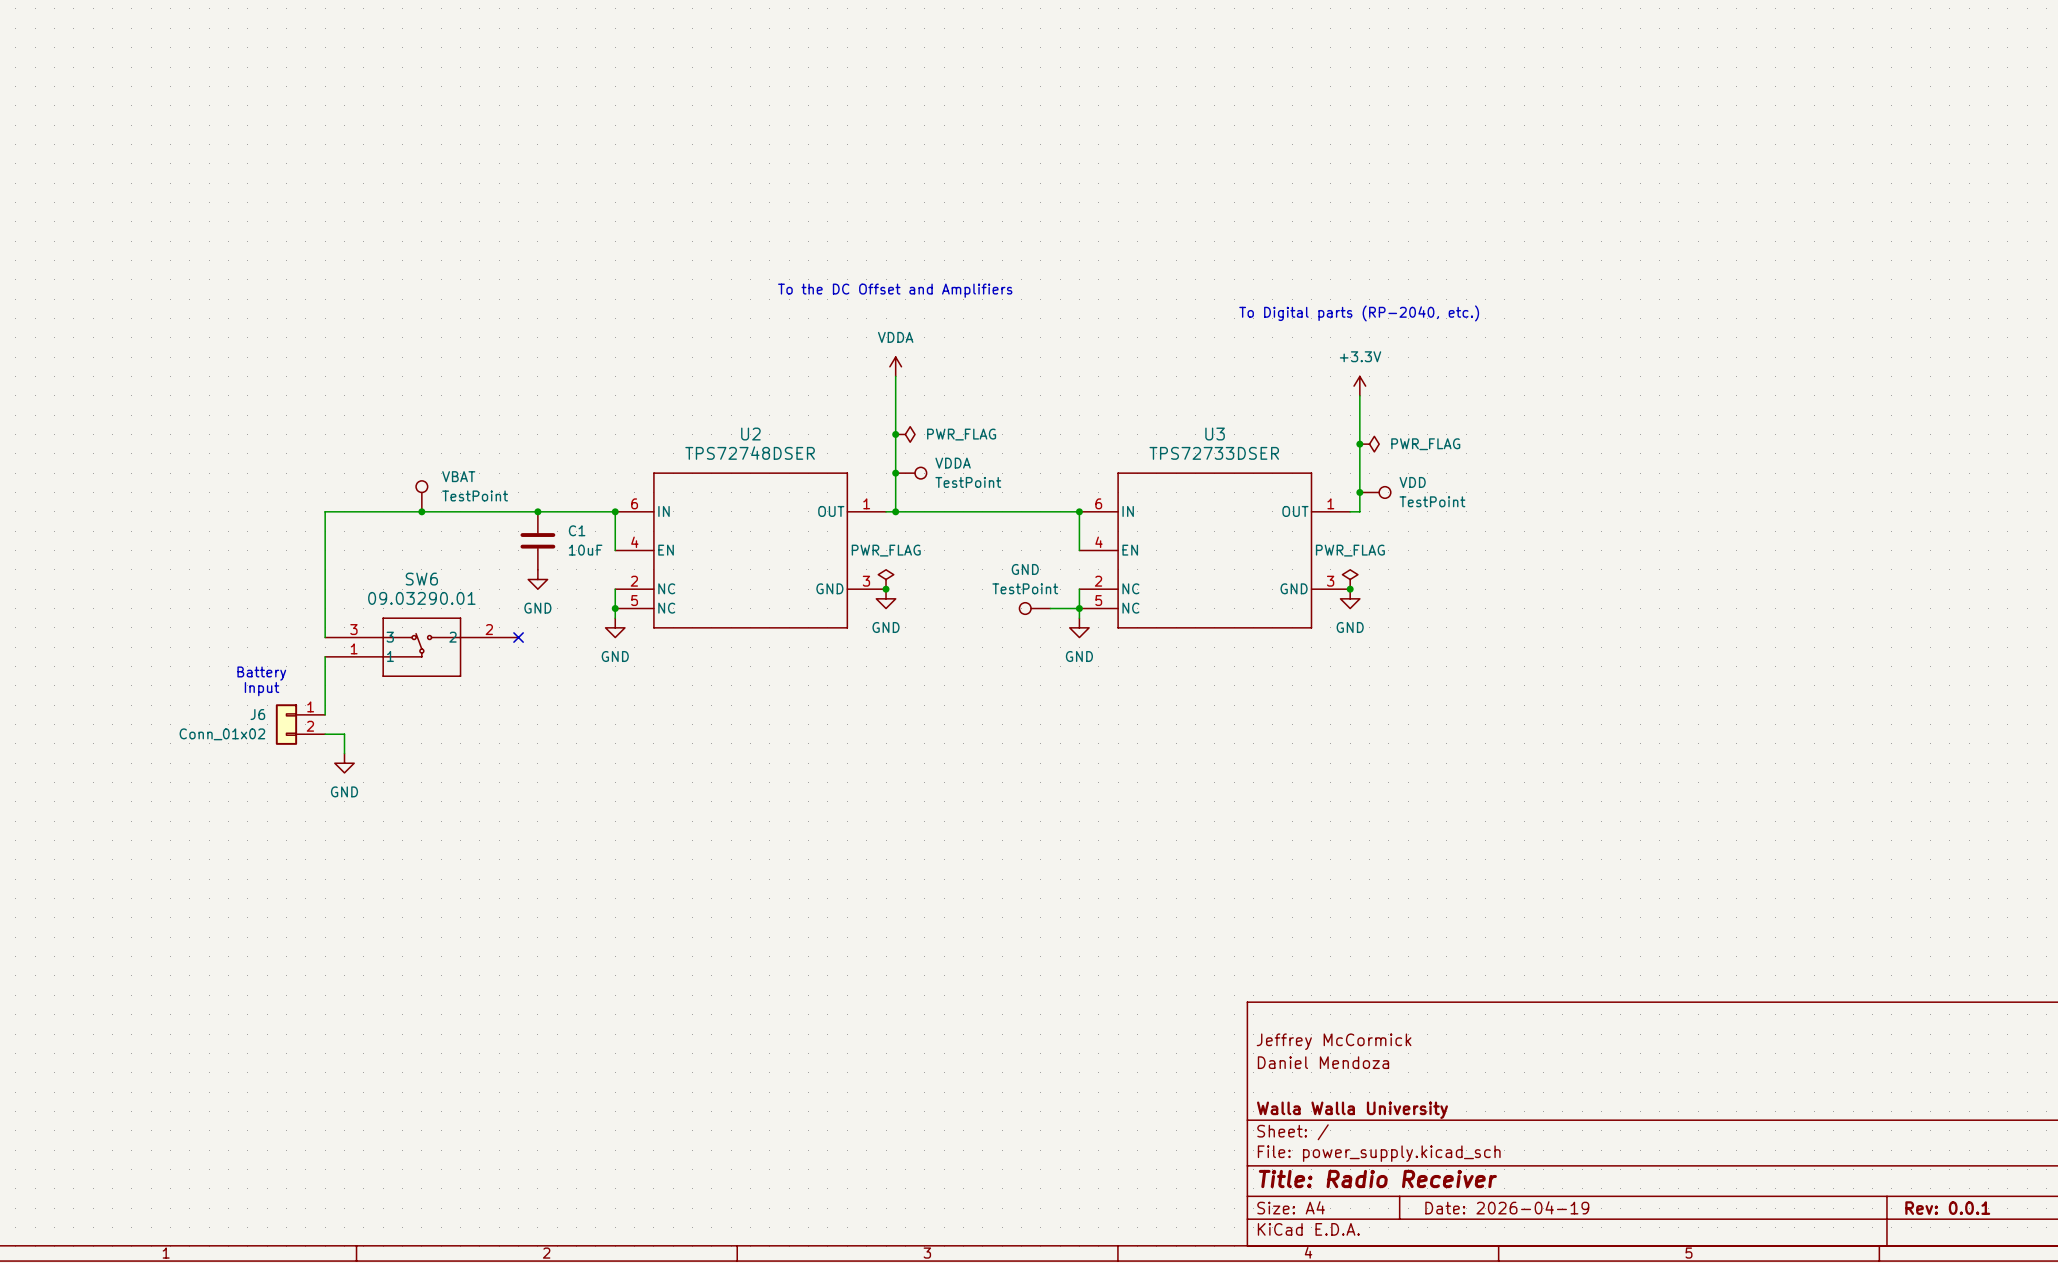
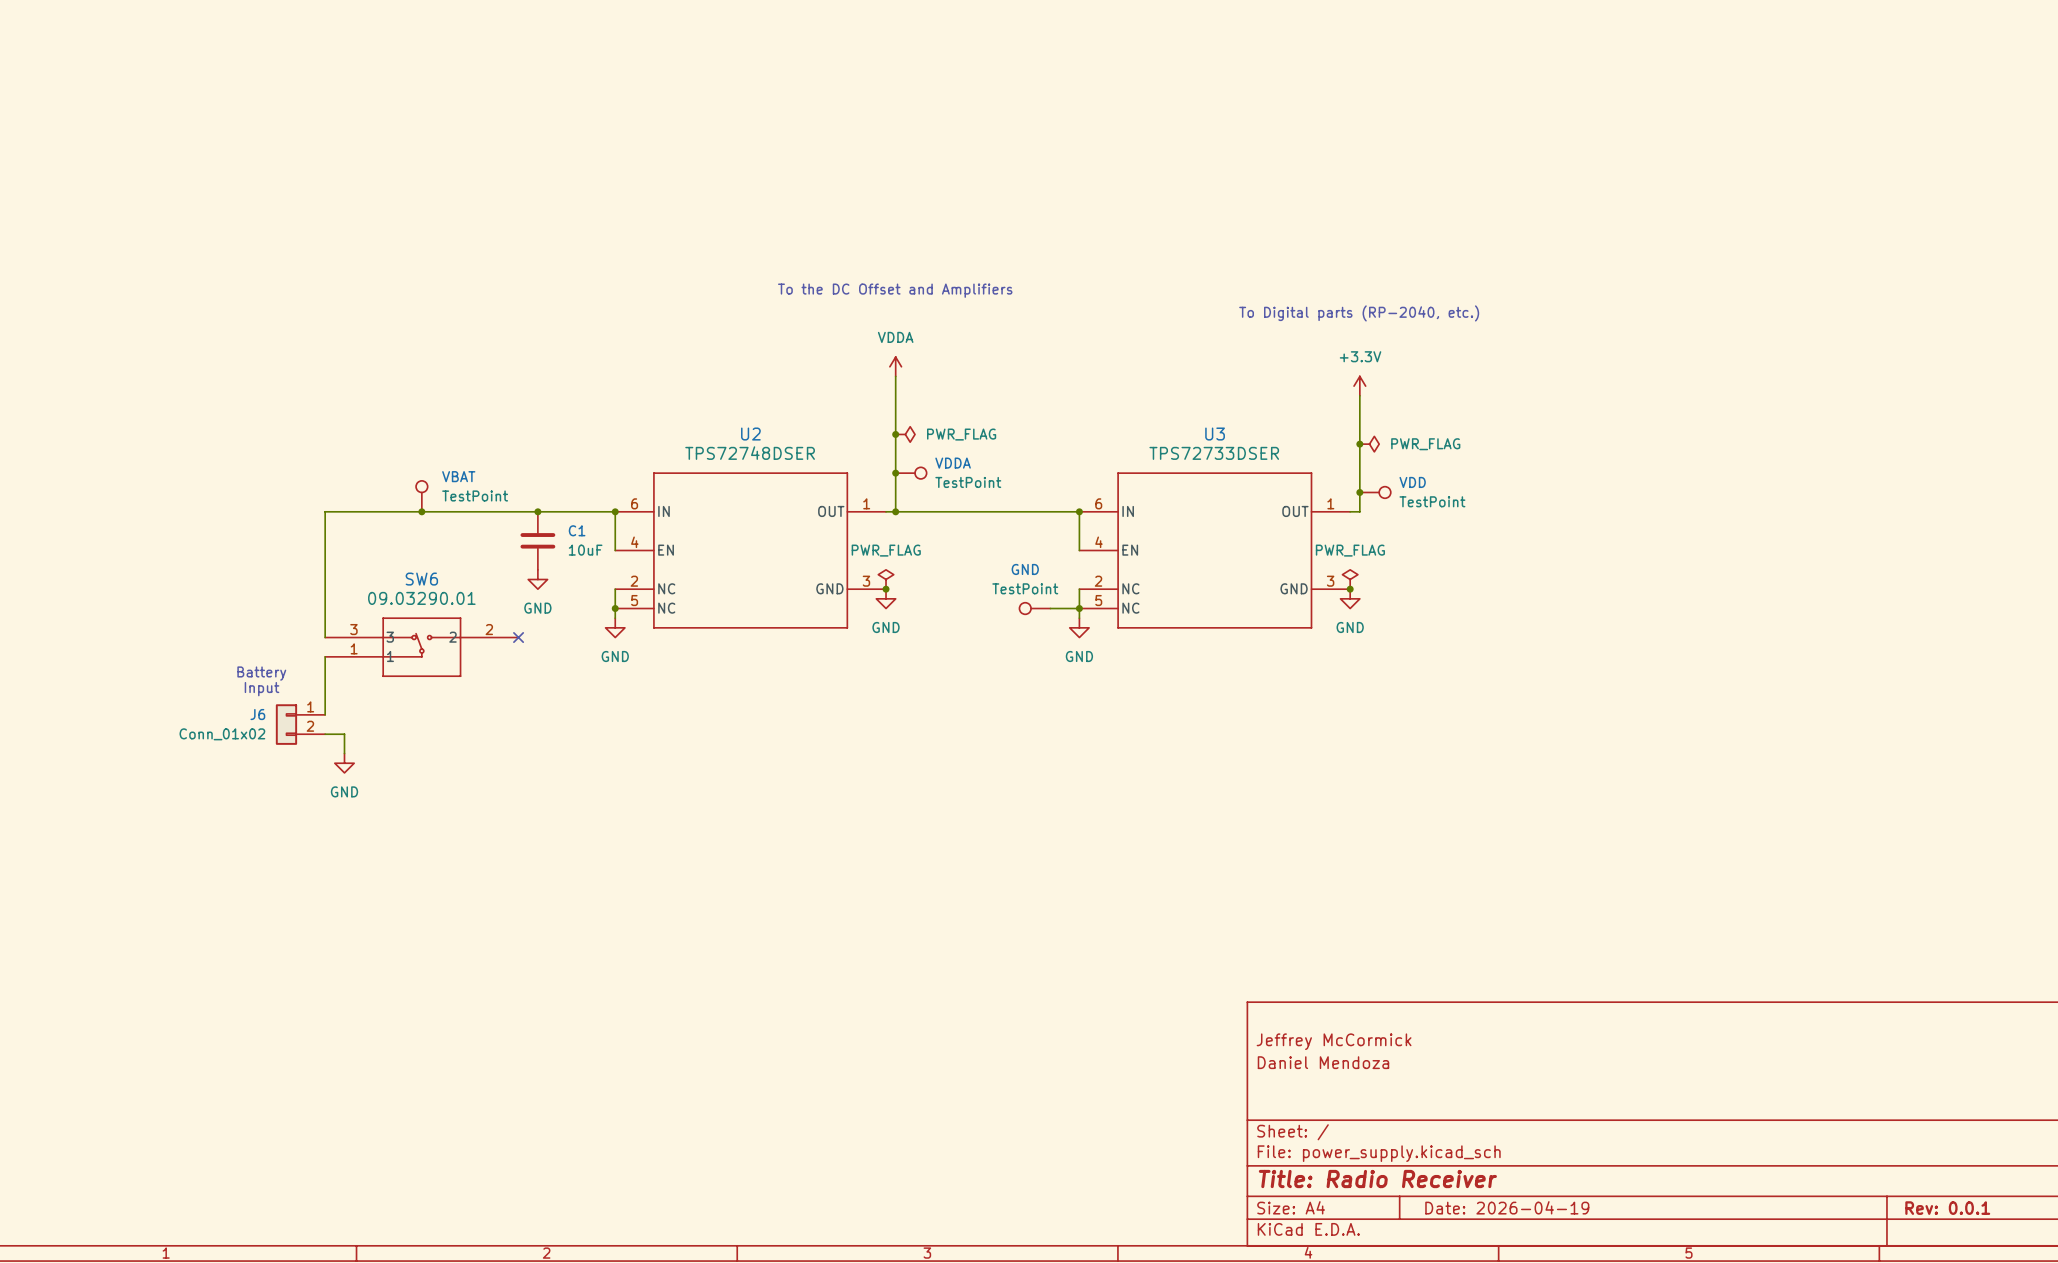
title block: Walla Walla University (1352, 1110) -> none

